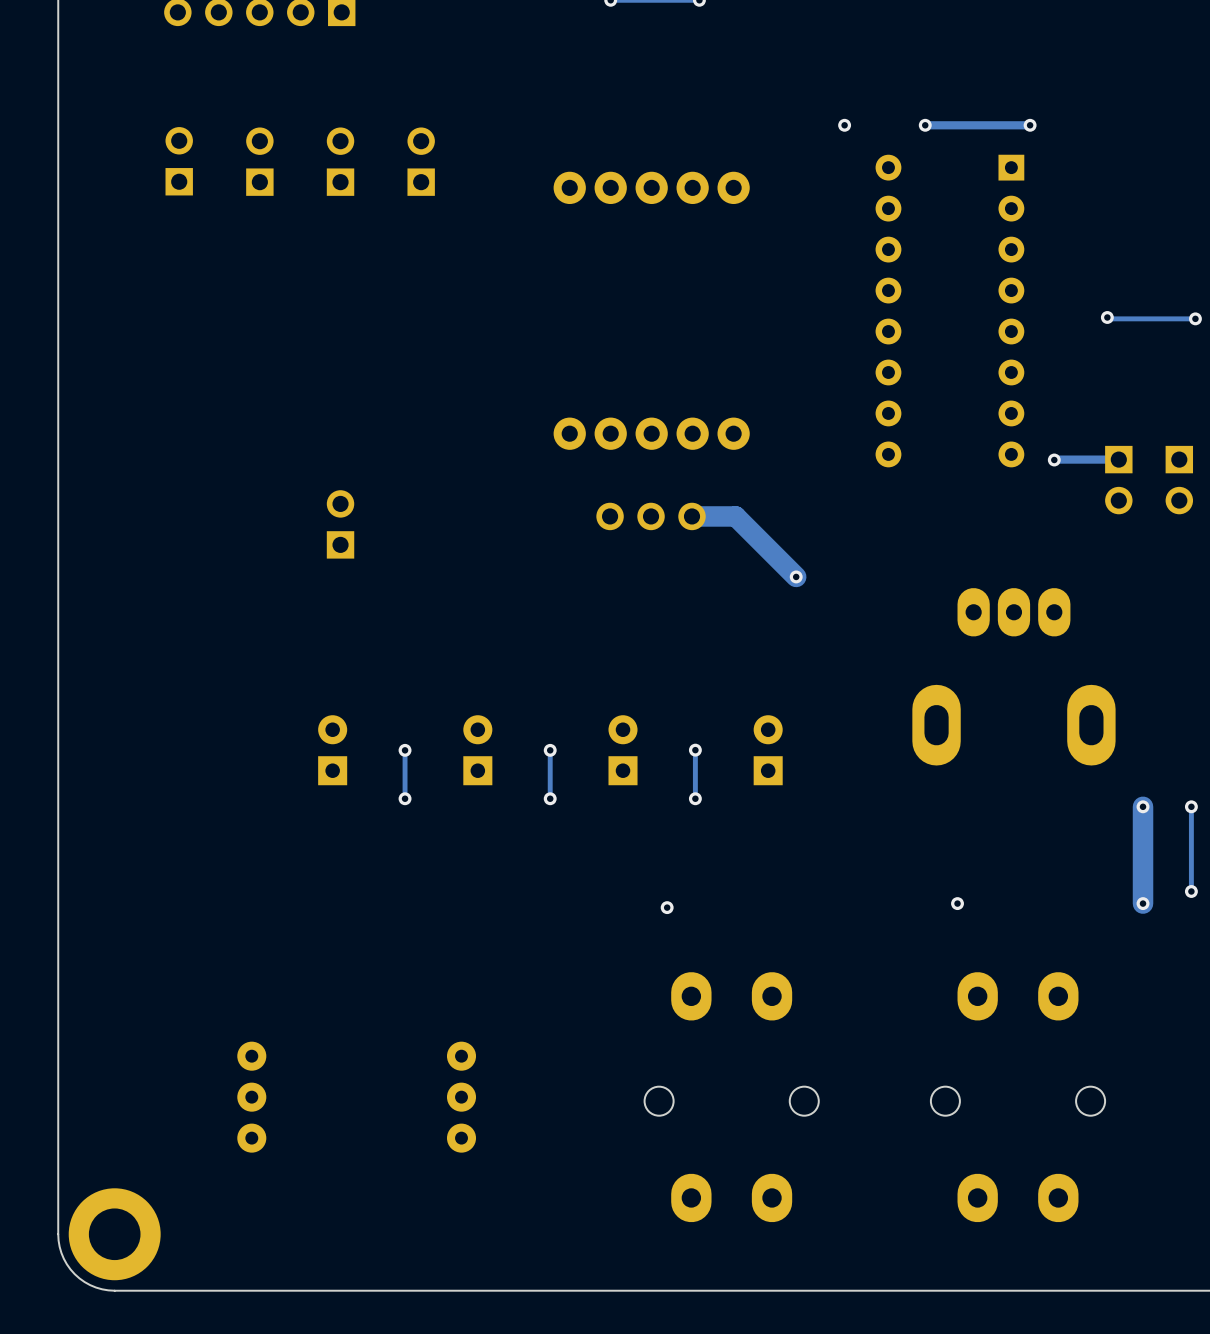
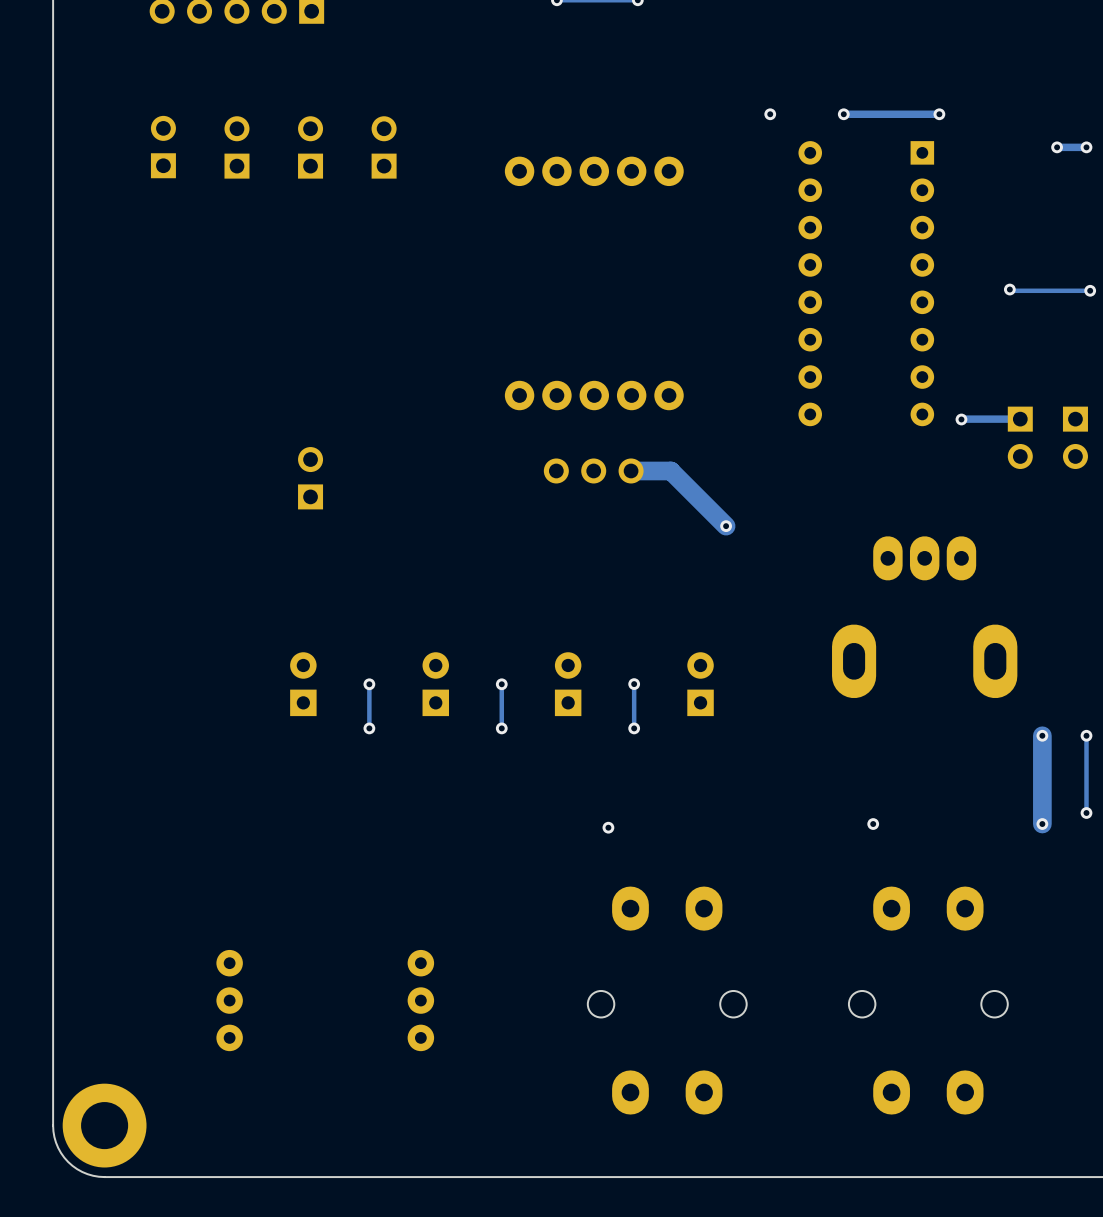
via: none -> (1057, 147)
track: none -> (1086, 147) (1057, 147)
via: none -> (1086, 147)

